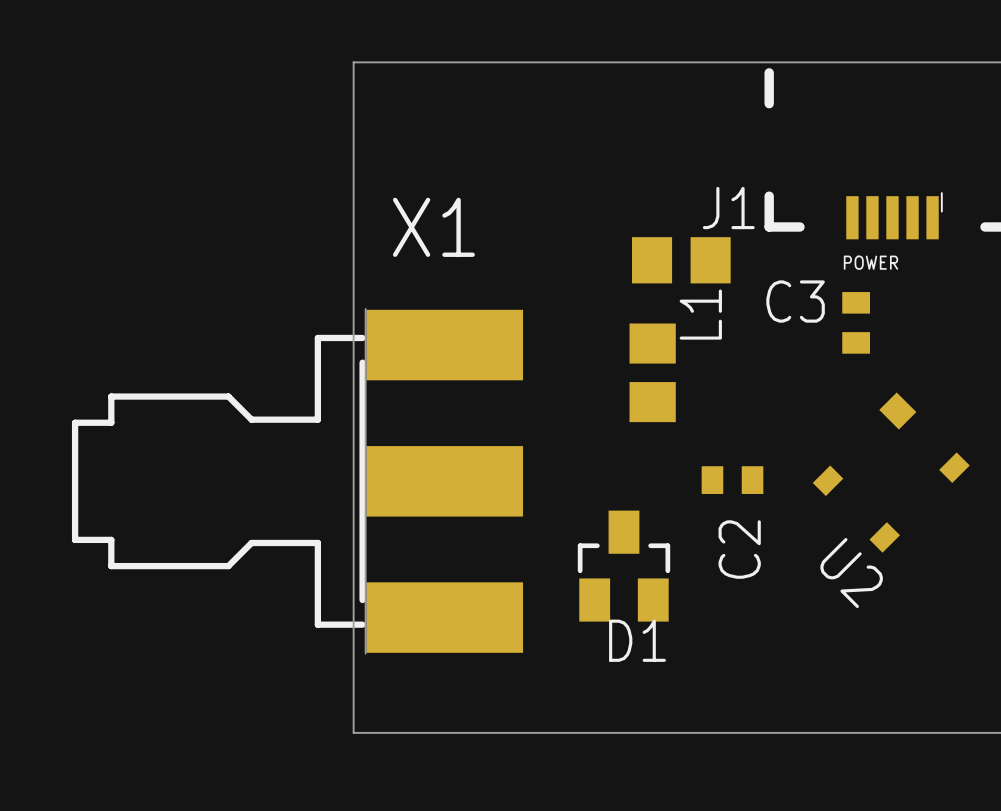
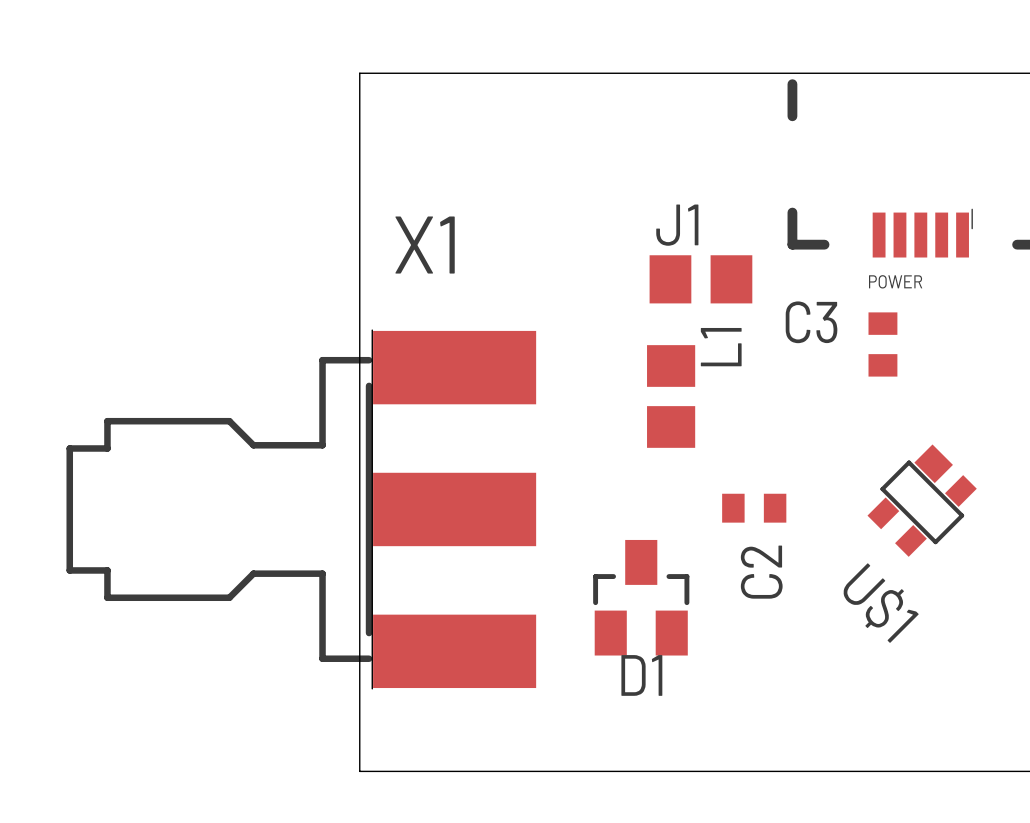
J1 name position: J1 (728, 208) -> J1 (677, 225)
U2: (891, 472) -> none
U$1: none -> (922, 500)

